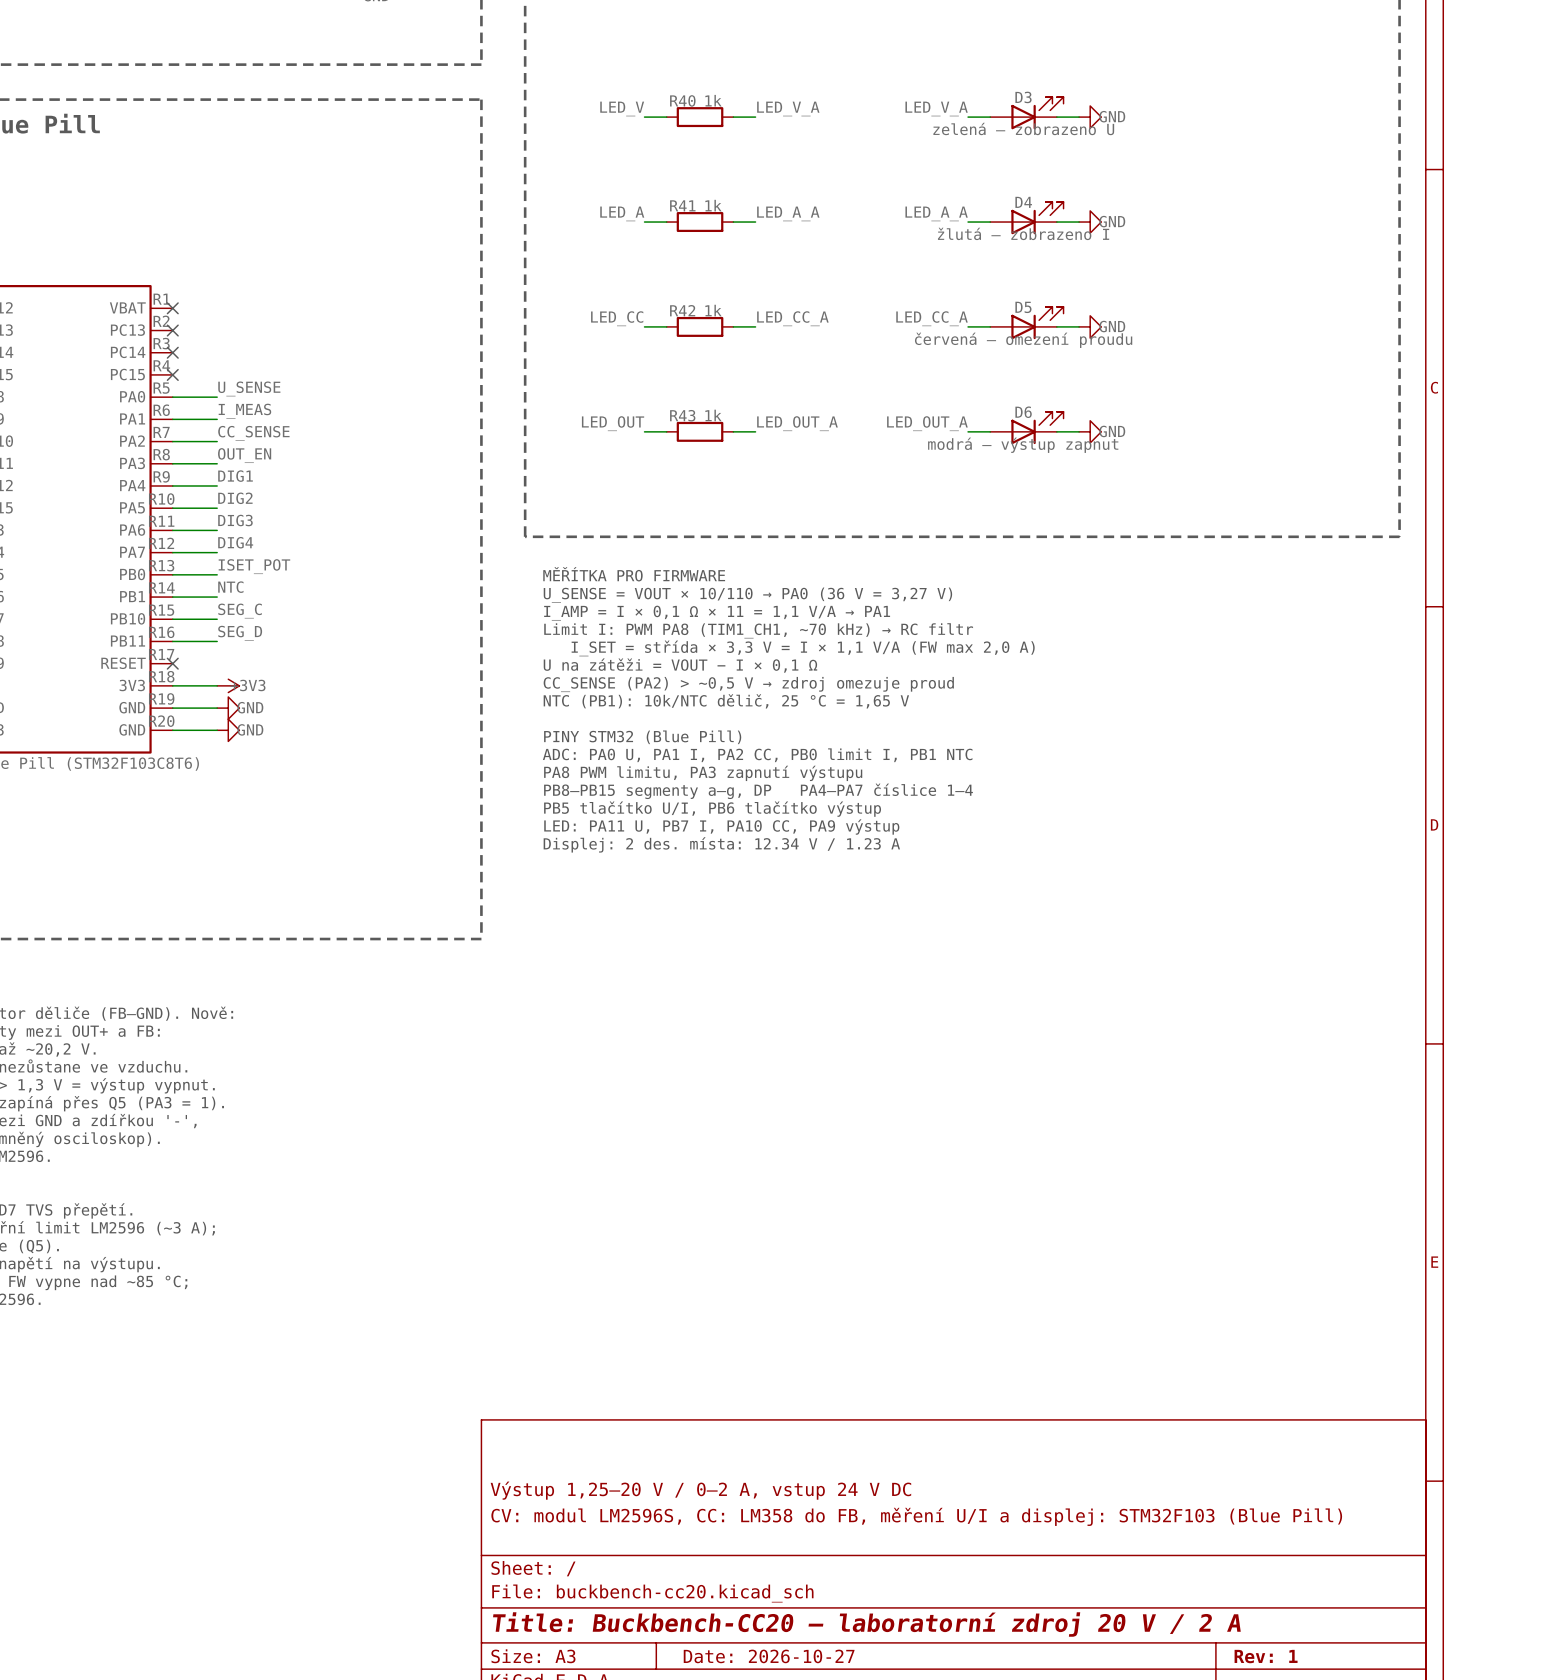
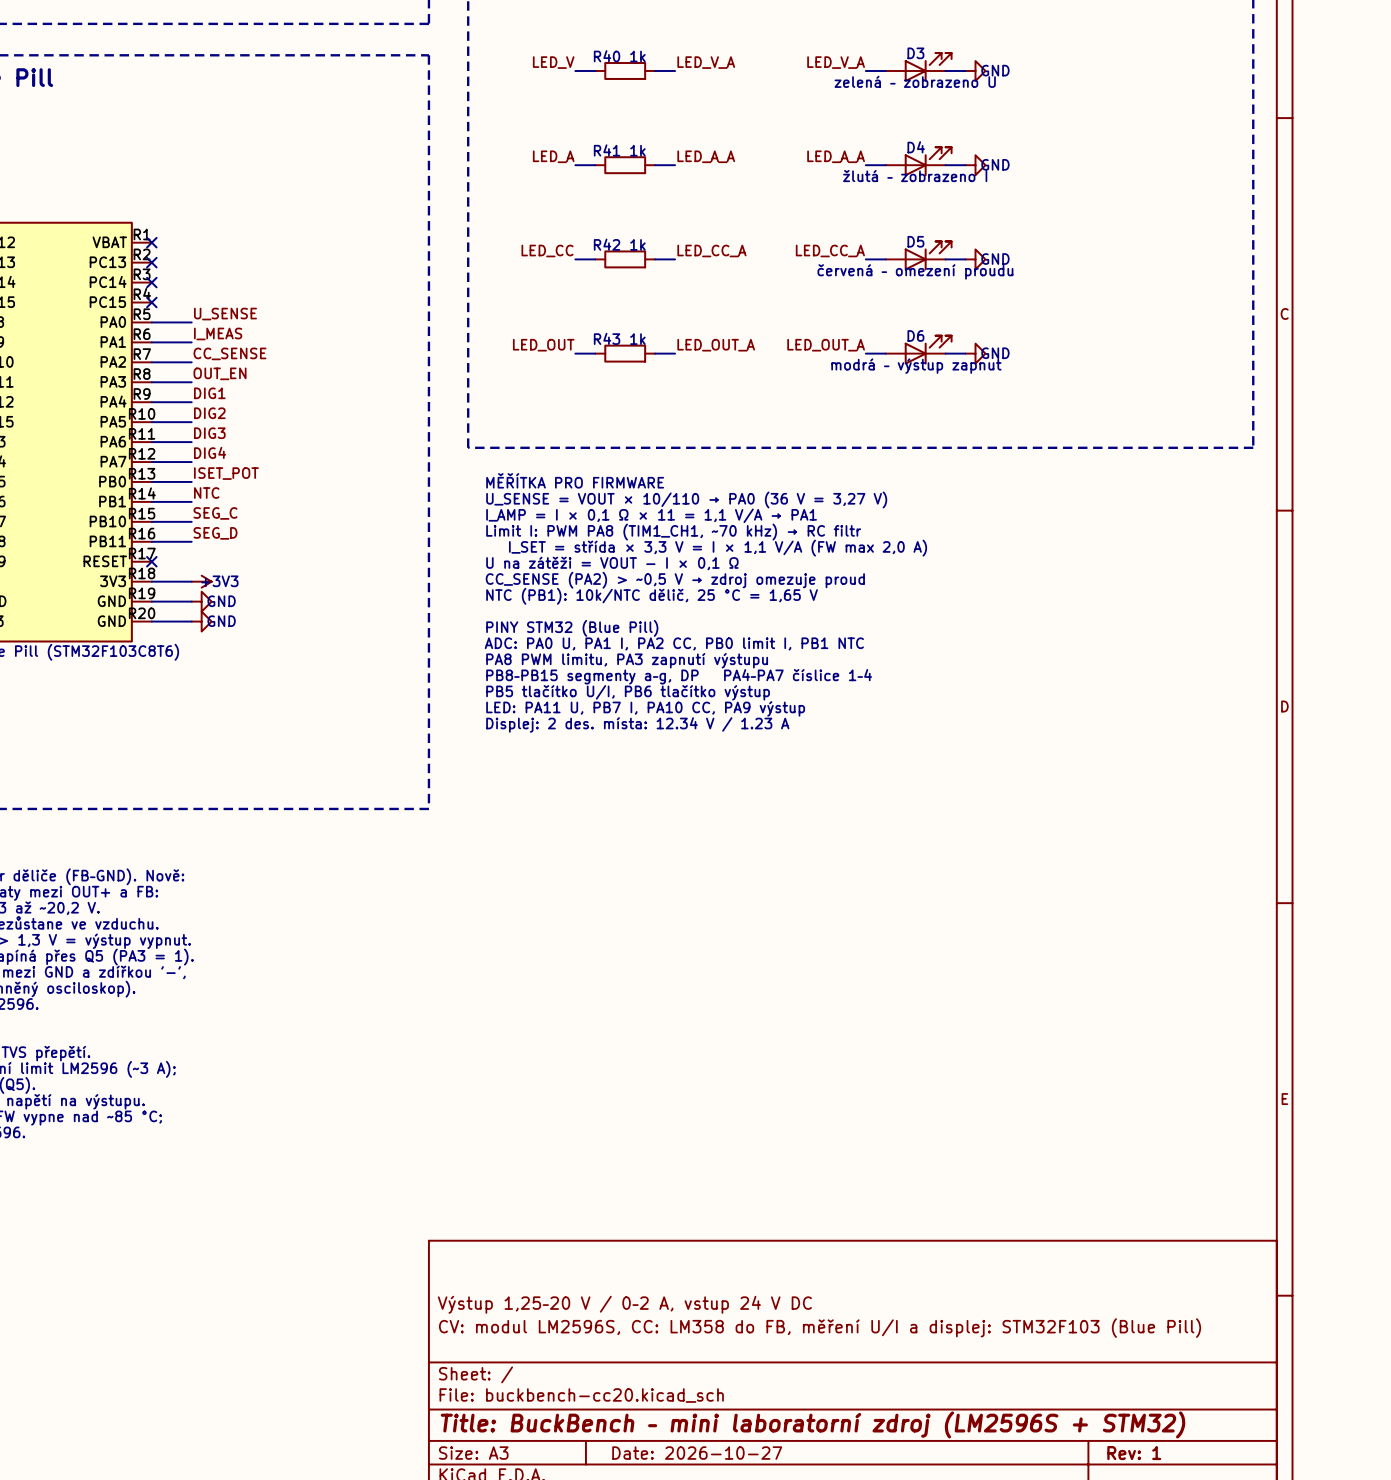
title block: Title: Buckbench-CC20 – laboratorní zdroj 20 V / 2 A (866, 1624) -> Title: BuckBench – mini laboratorní zdroj (LM2596S + STM32) (813, 1424)

